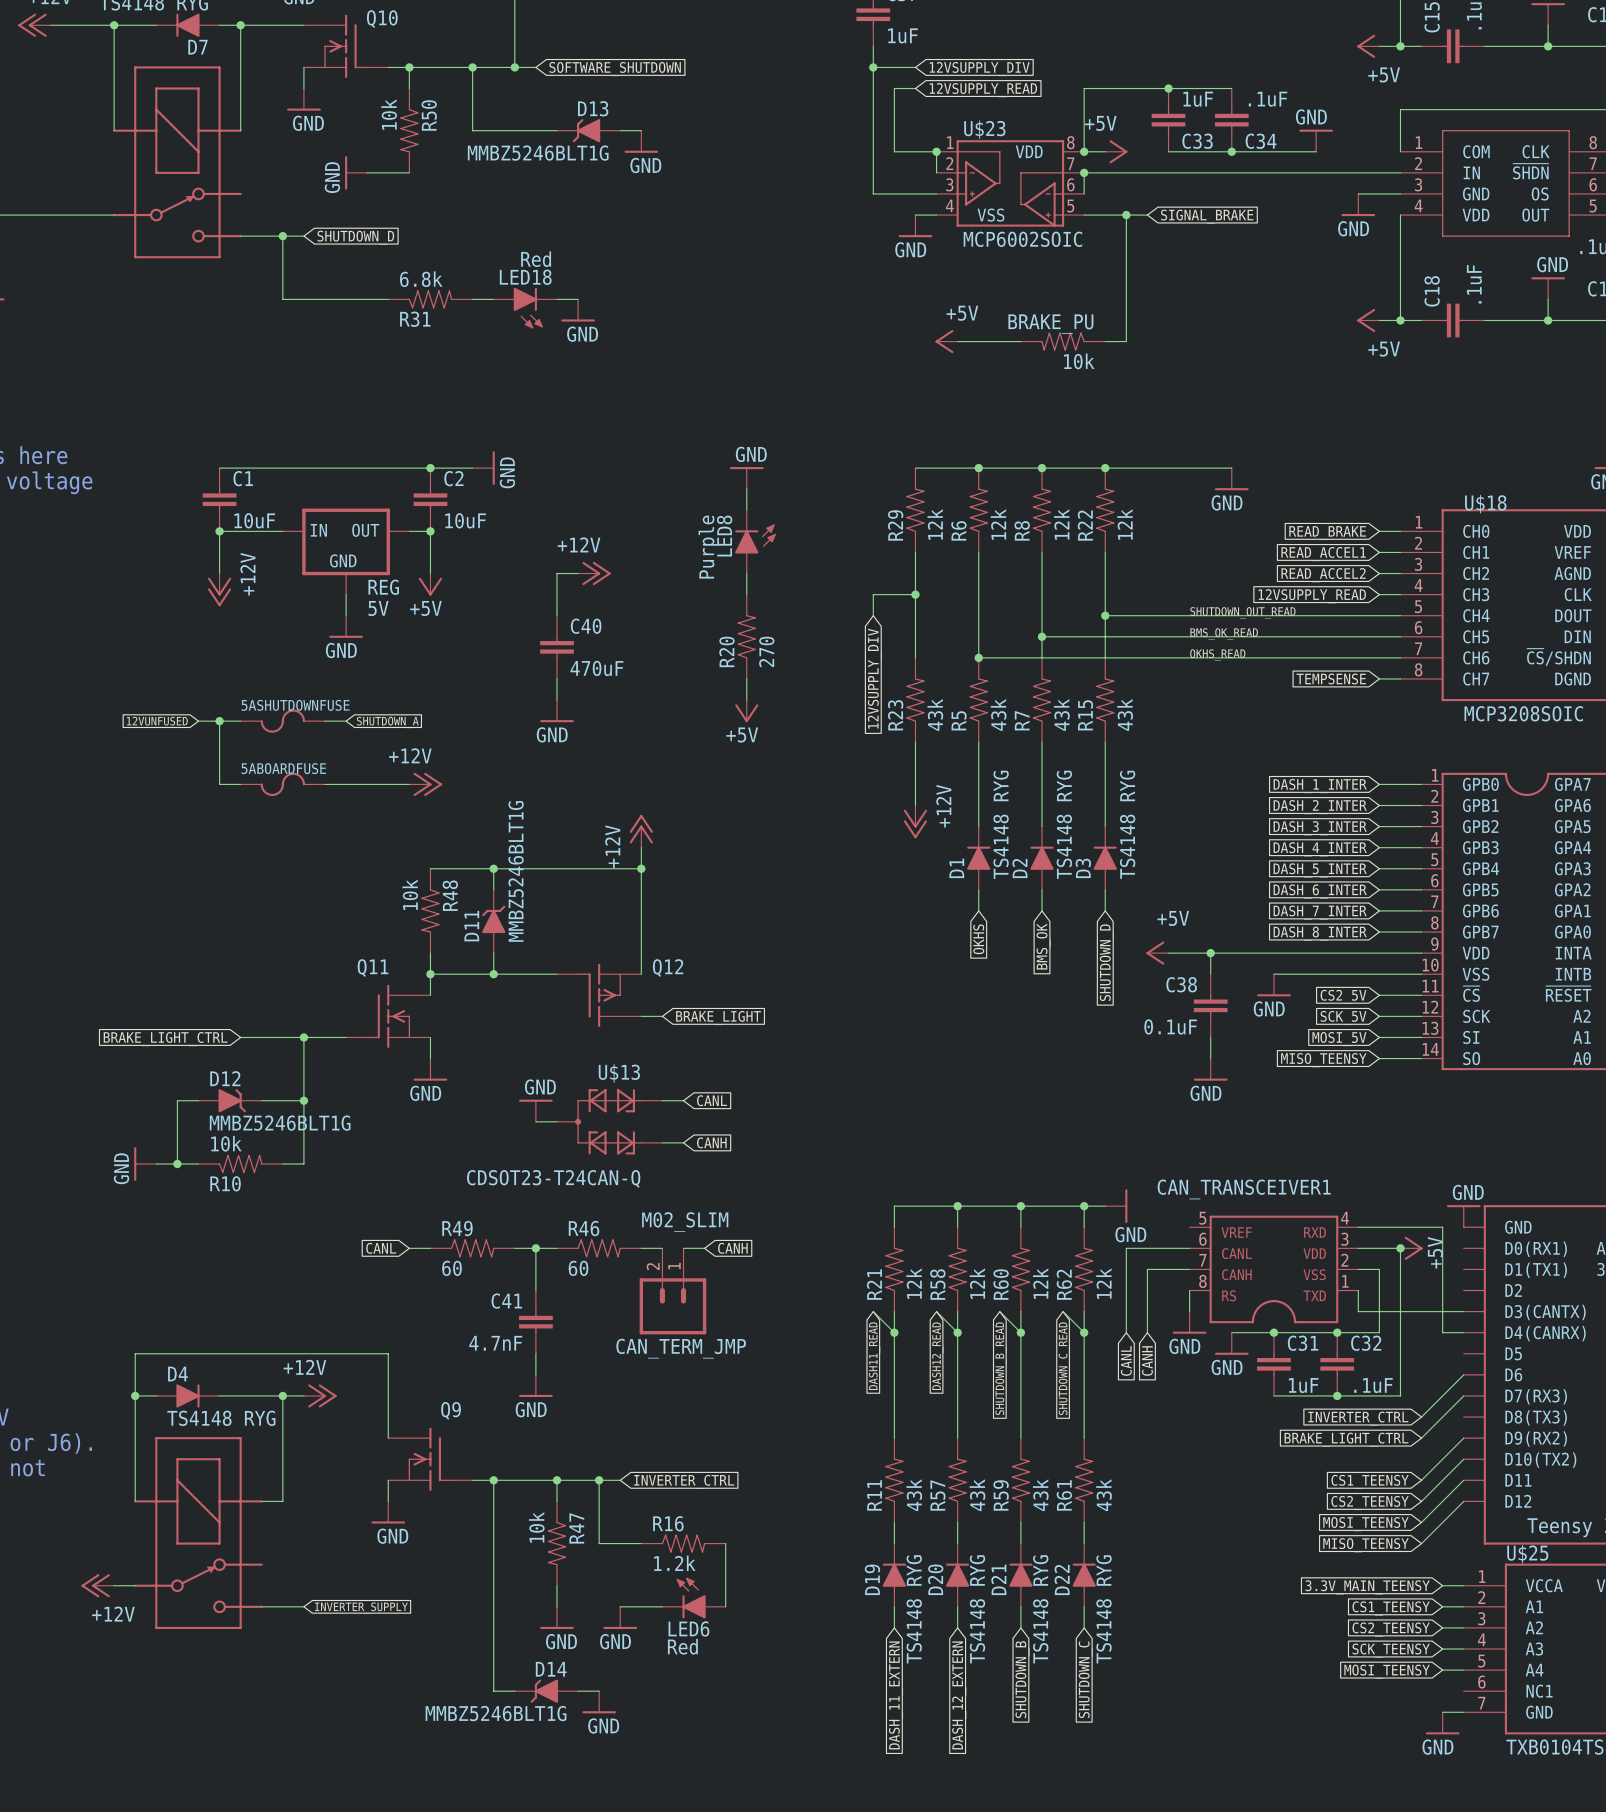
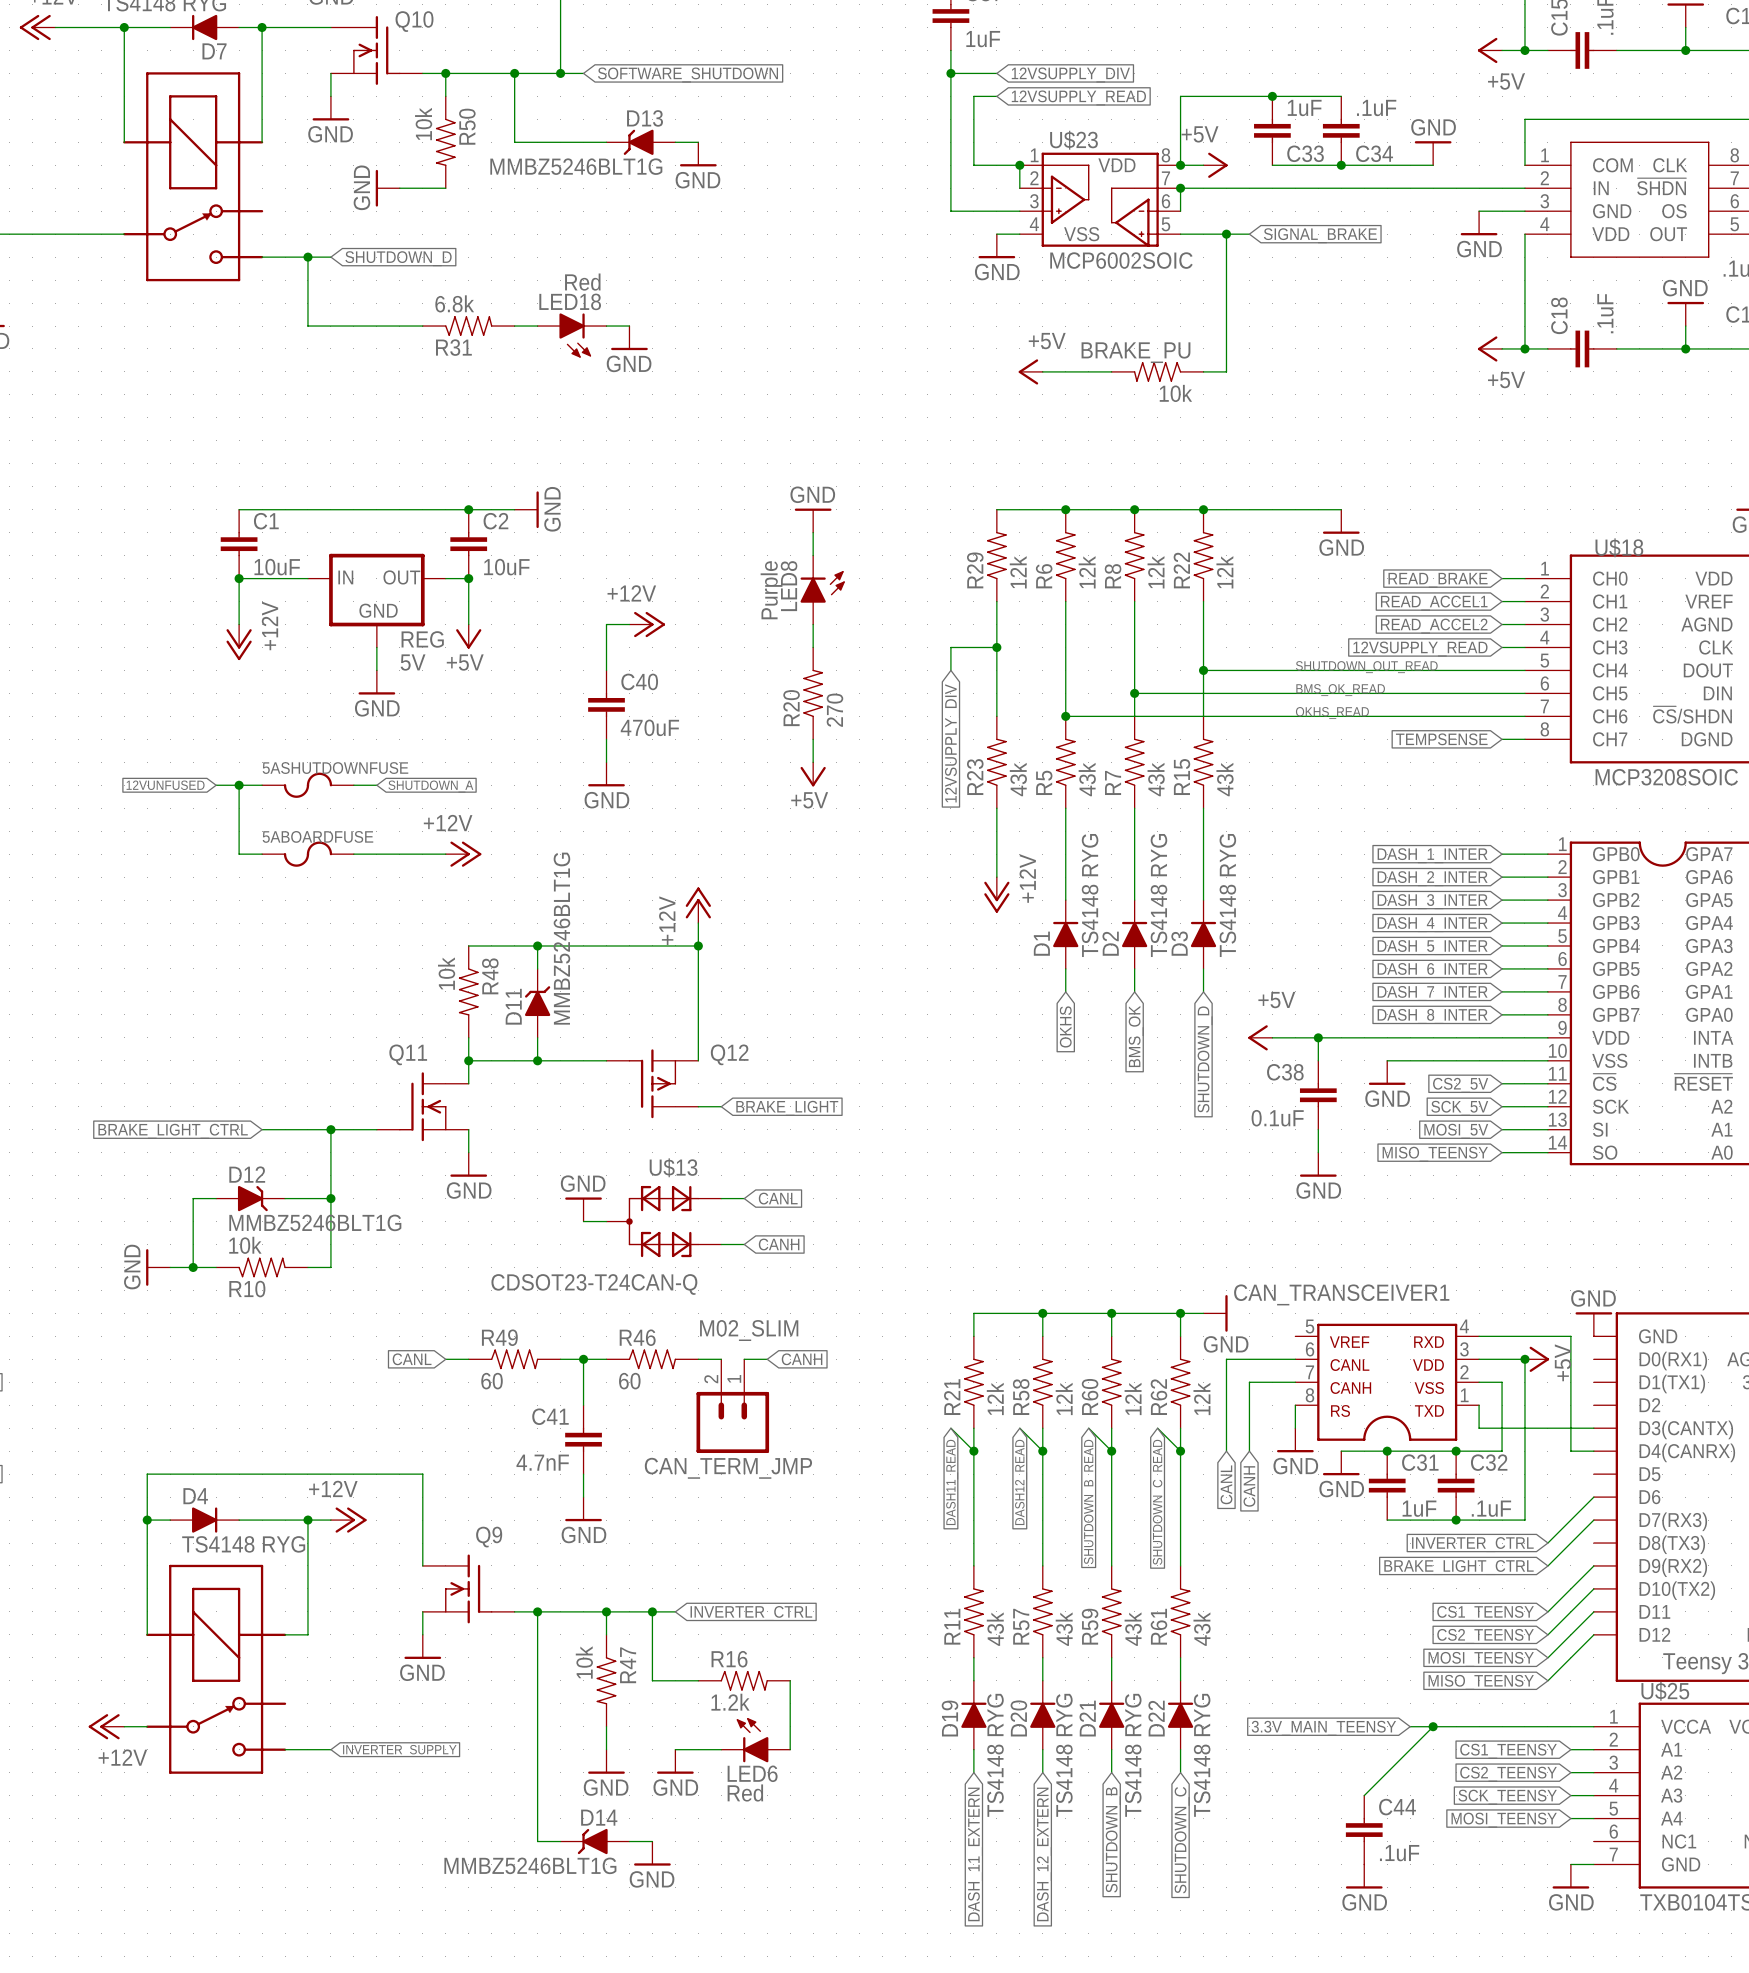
wire: none -> (1410, 1726) (1570, 1726)
wire: none -> (1433, 1726) (1364, 1795)
junction: none -> (1433, 1726)
global label position: 3.3V_MAIN_TEENSY (1367, 1587) -> 3.3V_MAIN_TEENSY (1323, 1728)
C44: none -> .1uF (1364, 1830)
power symbol: none -> GND (1364, 1876)

